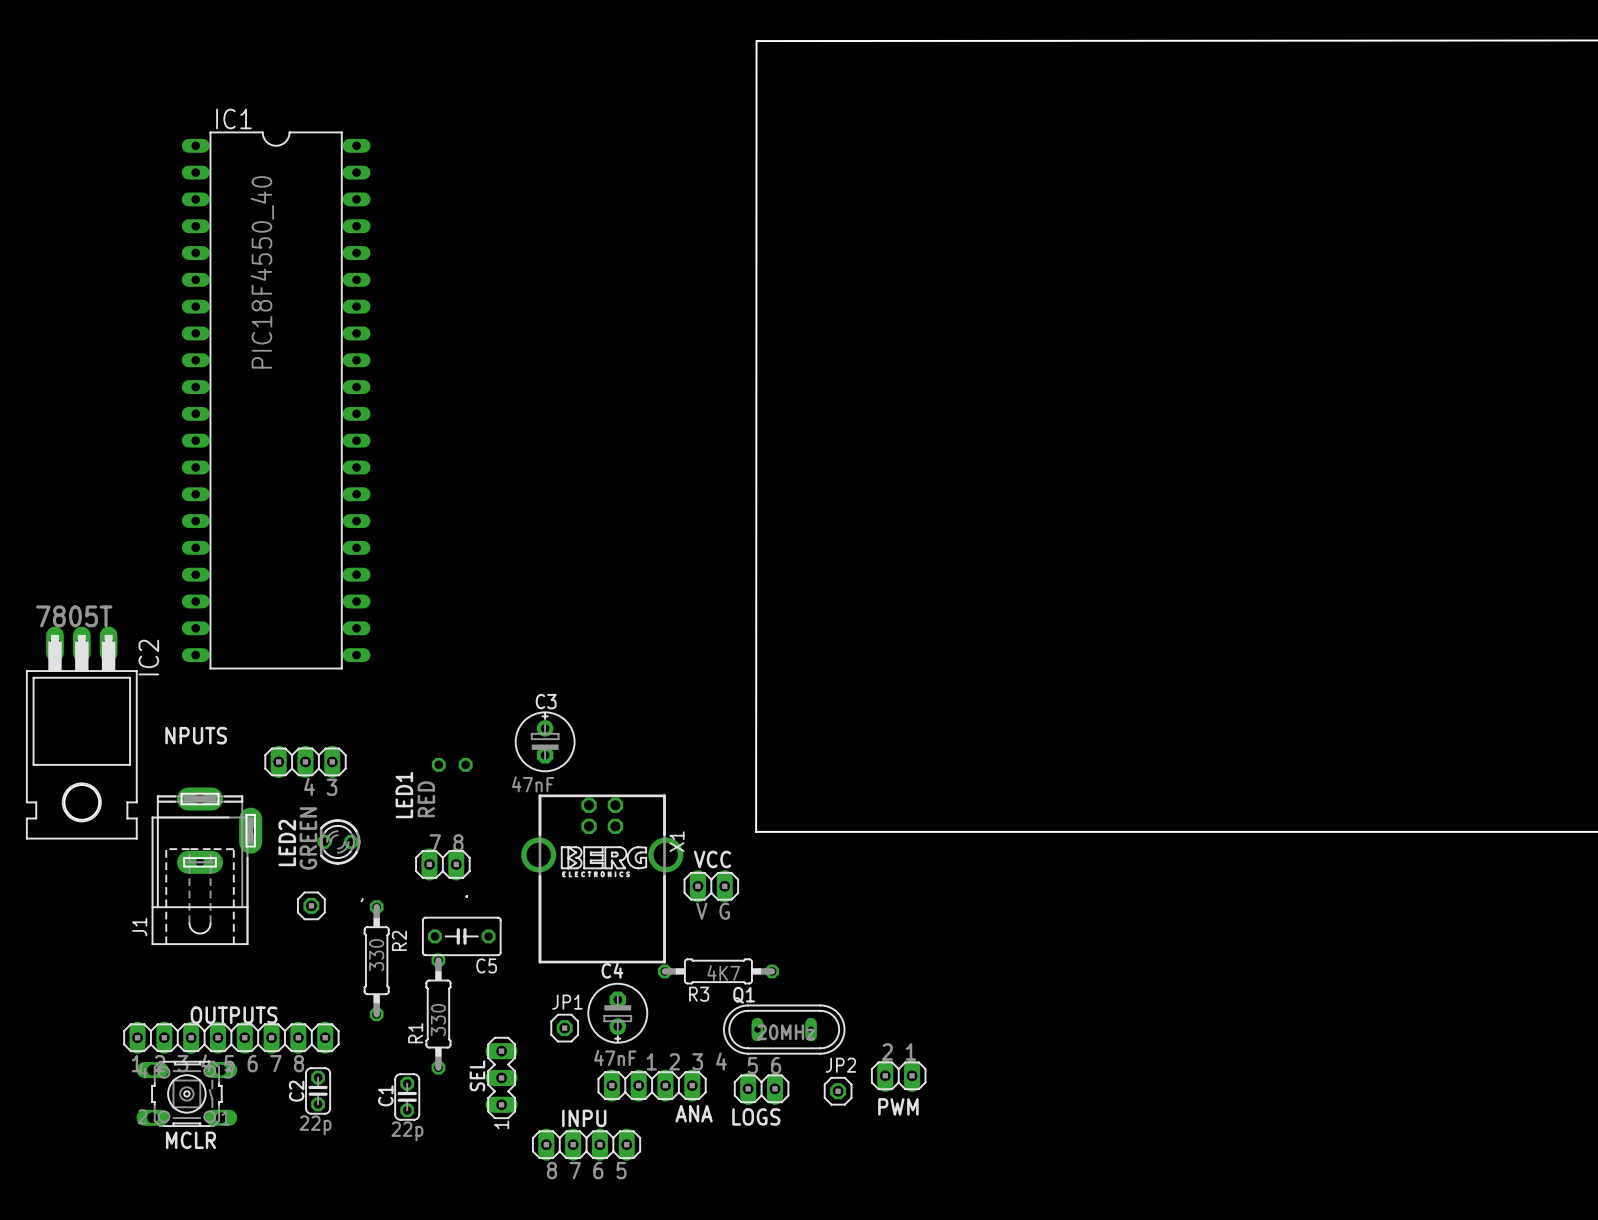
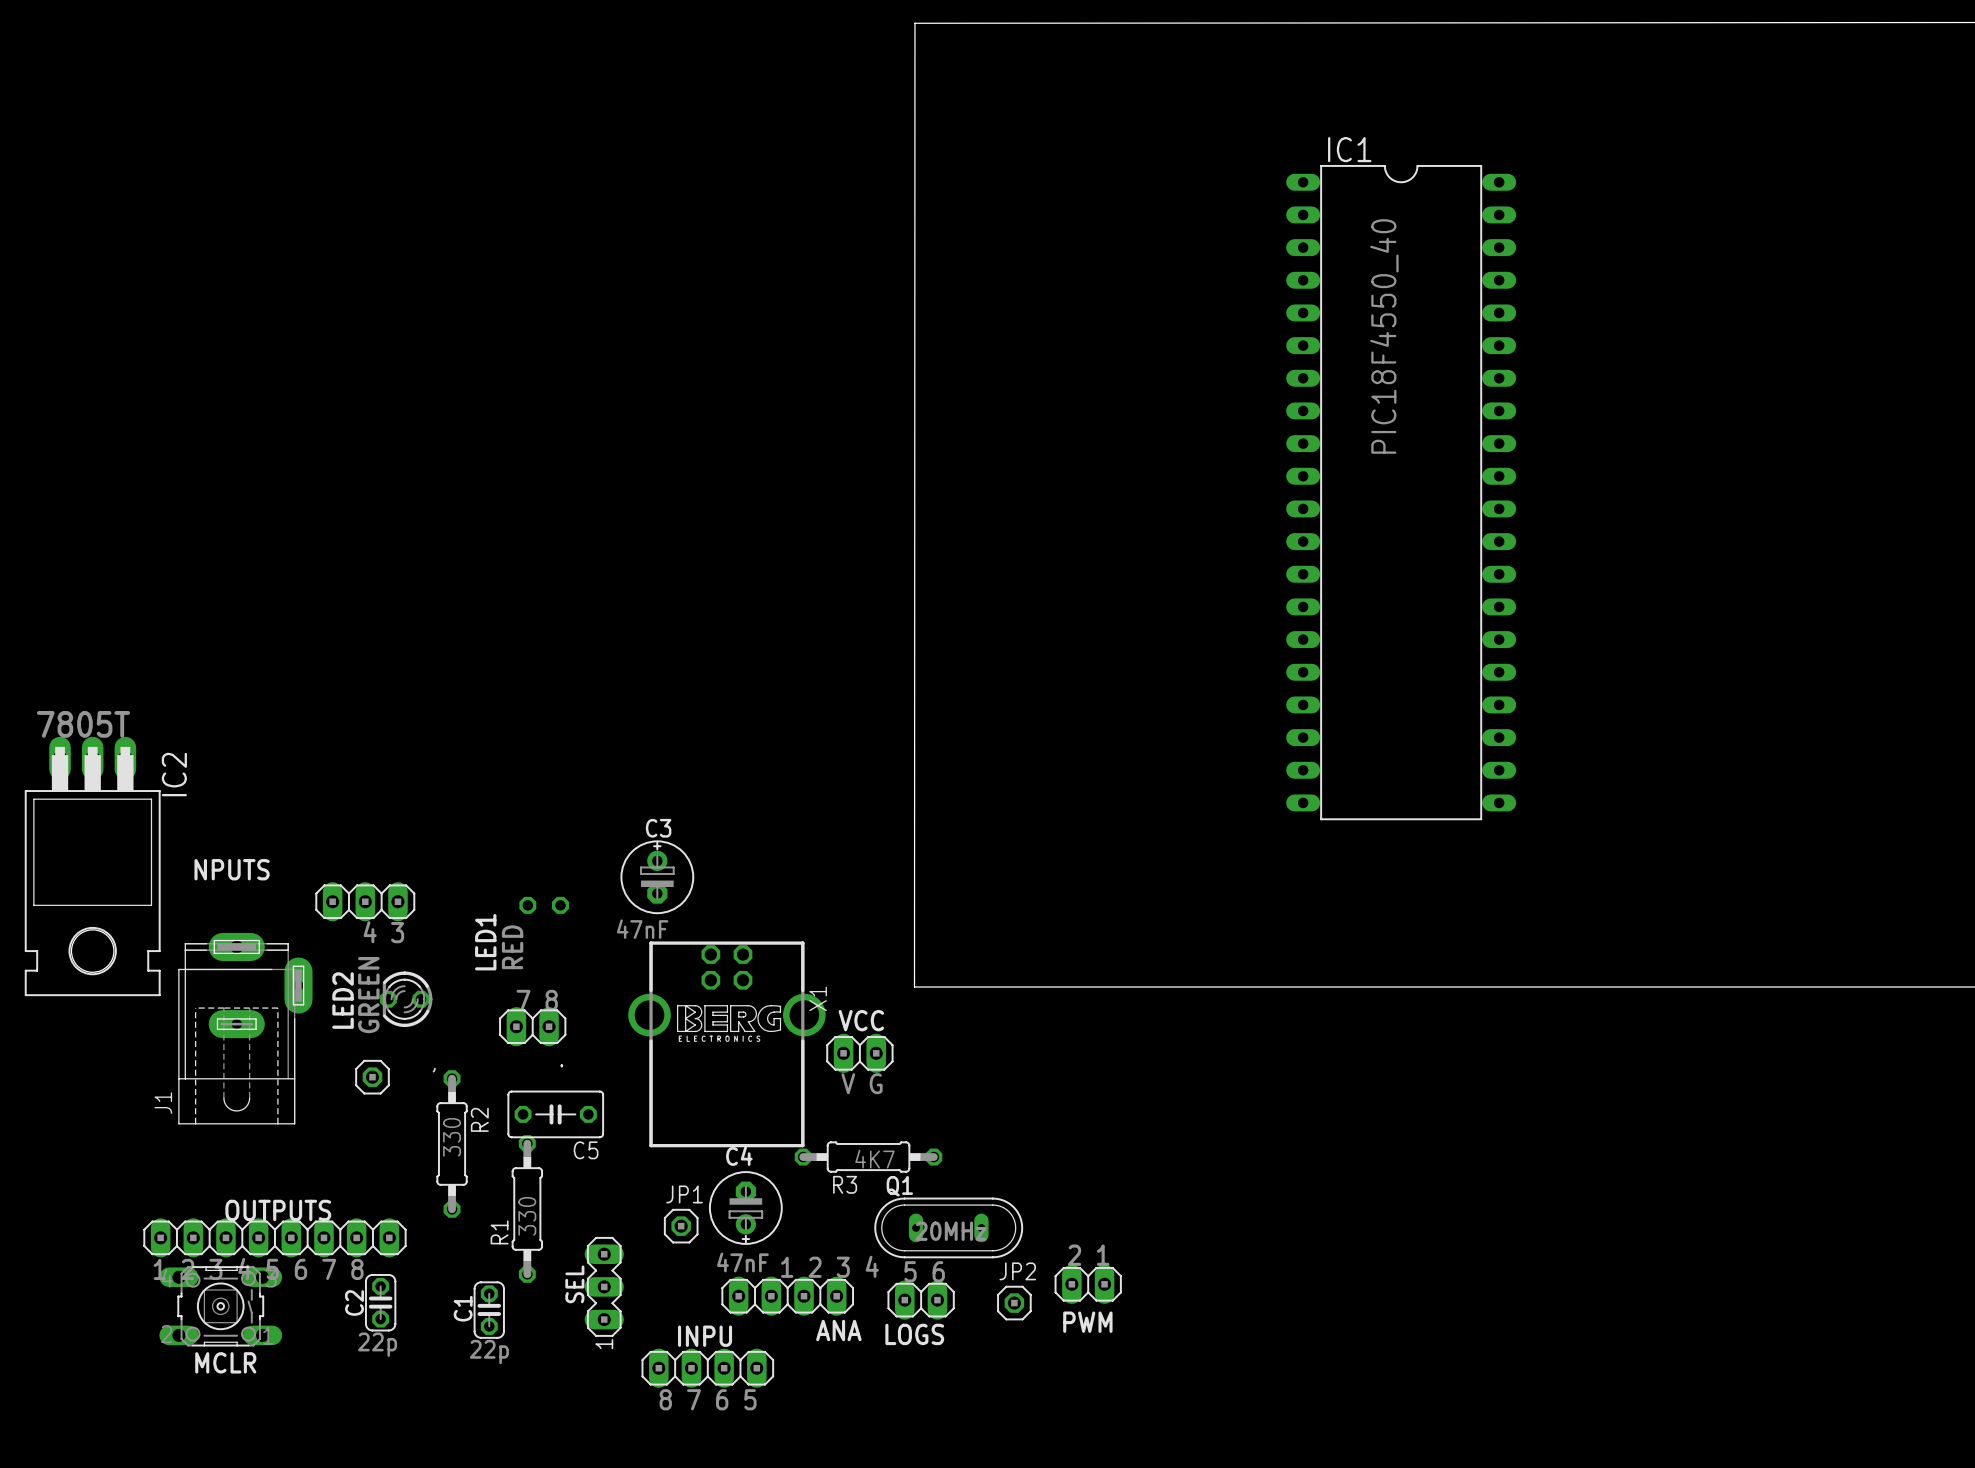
IC1 position: (276, 400) -> (1401, 492)

